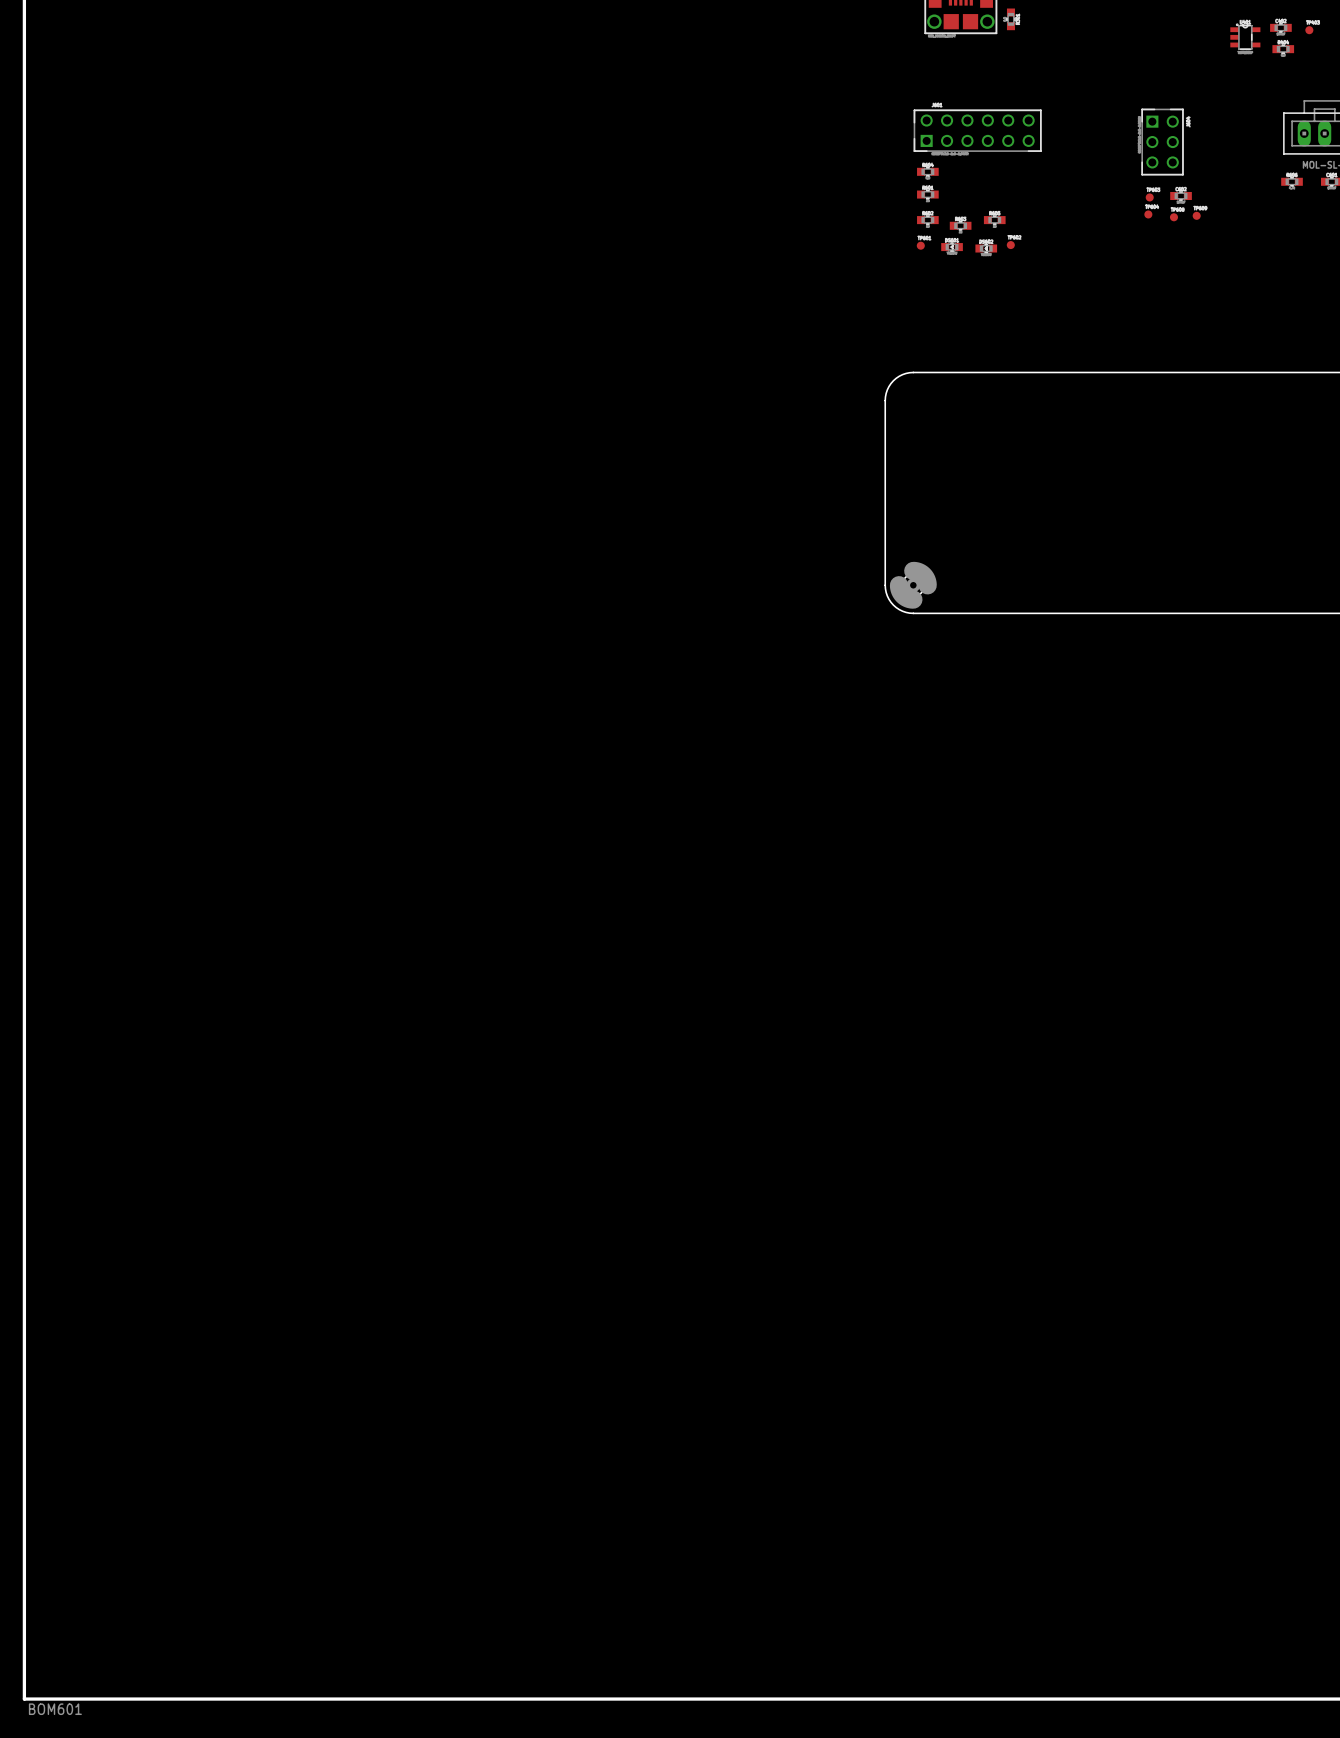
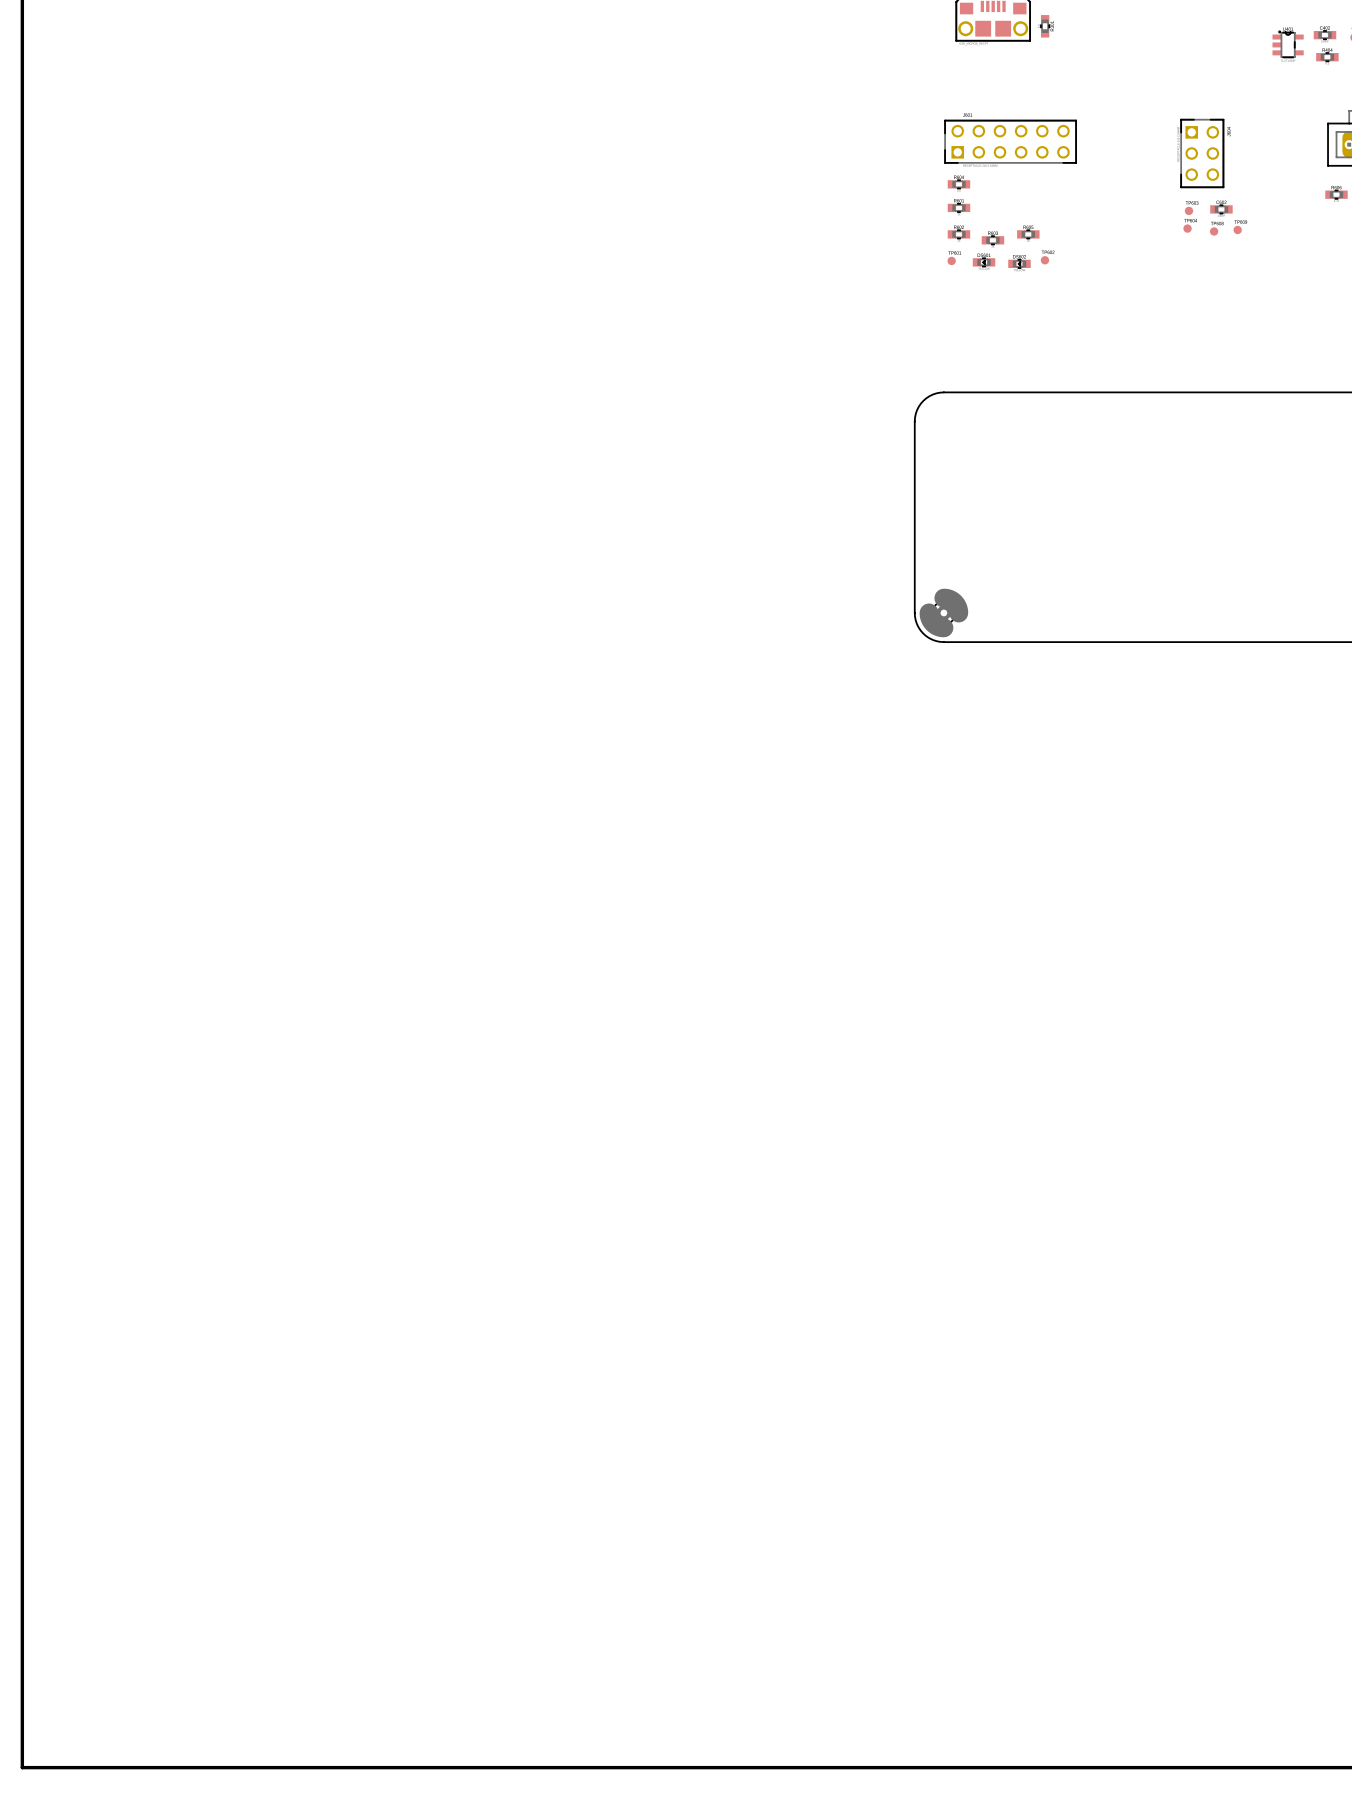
BOM601: (55, 1709) -> none

